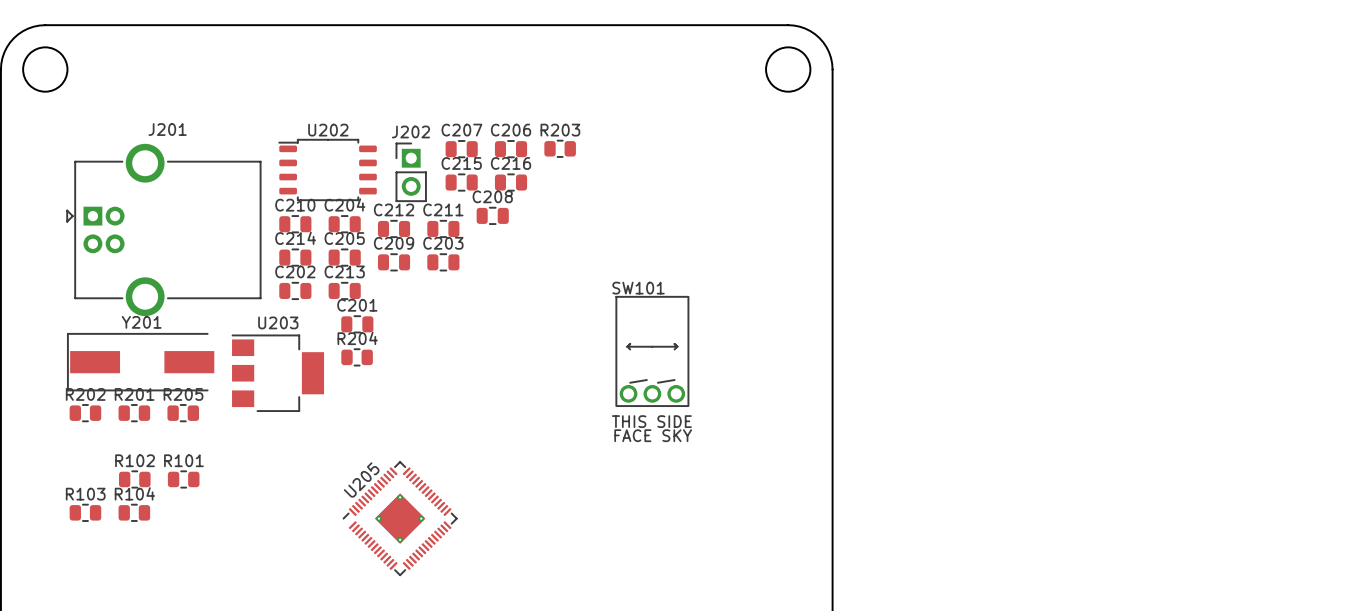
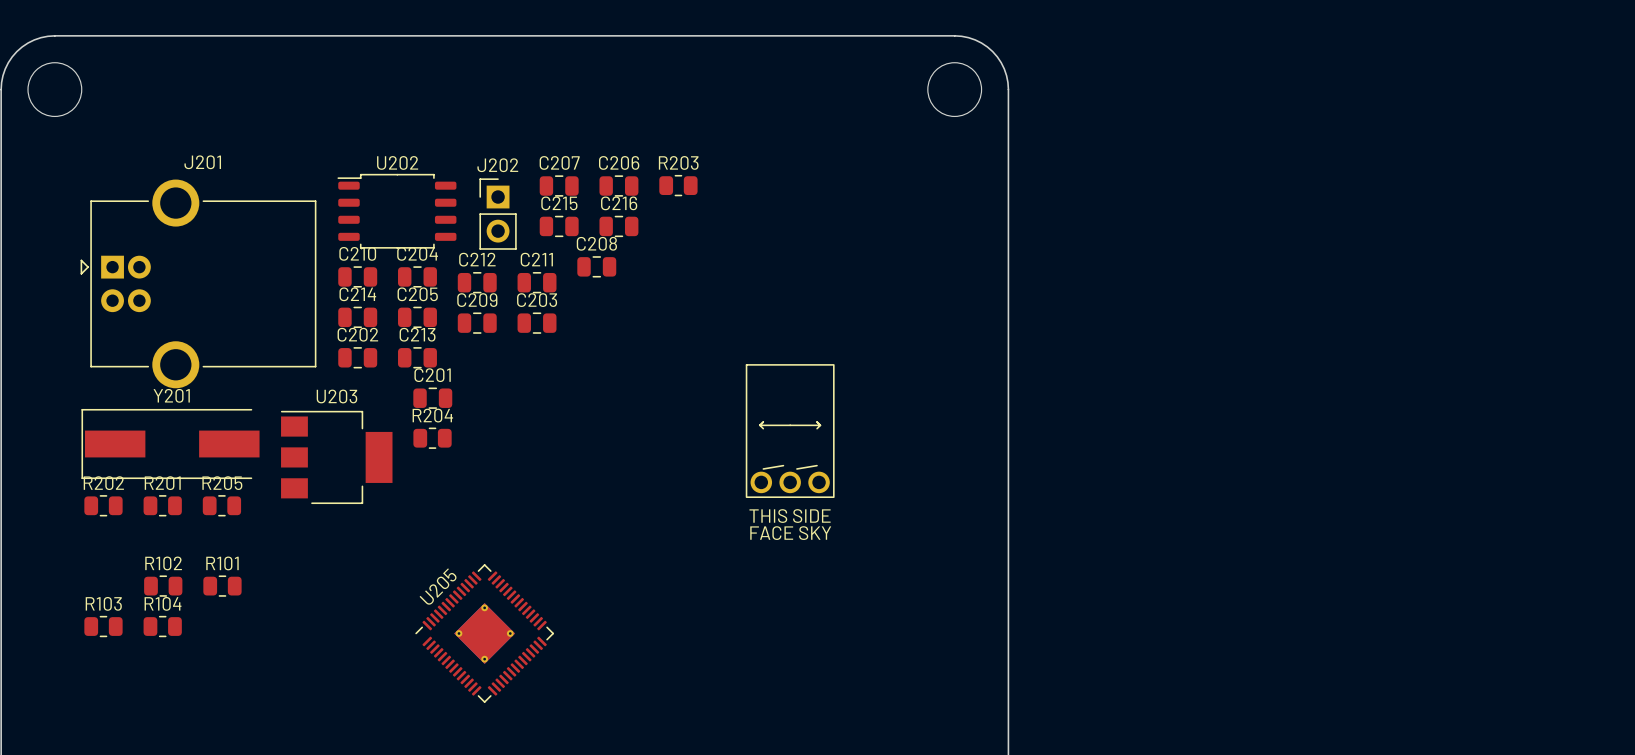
SW101 name: SW101 (638, 288) -> none

